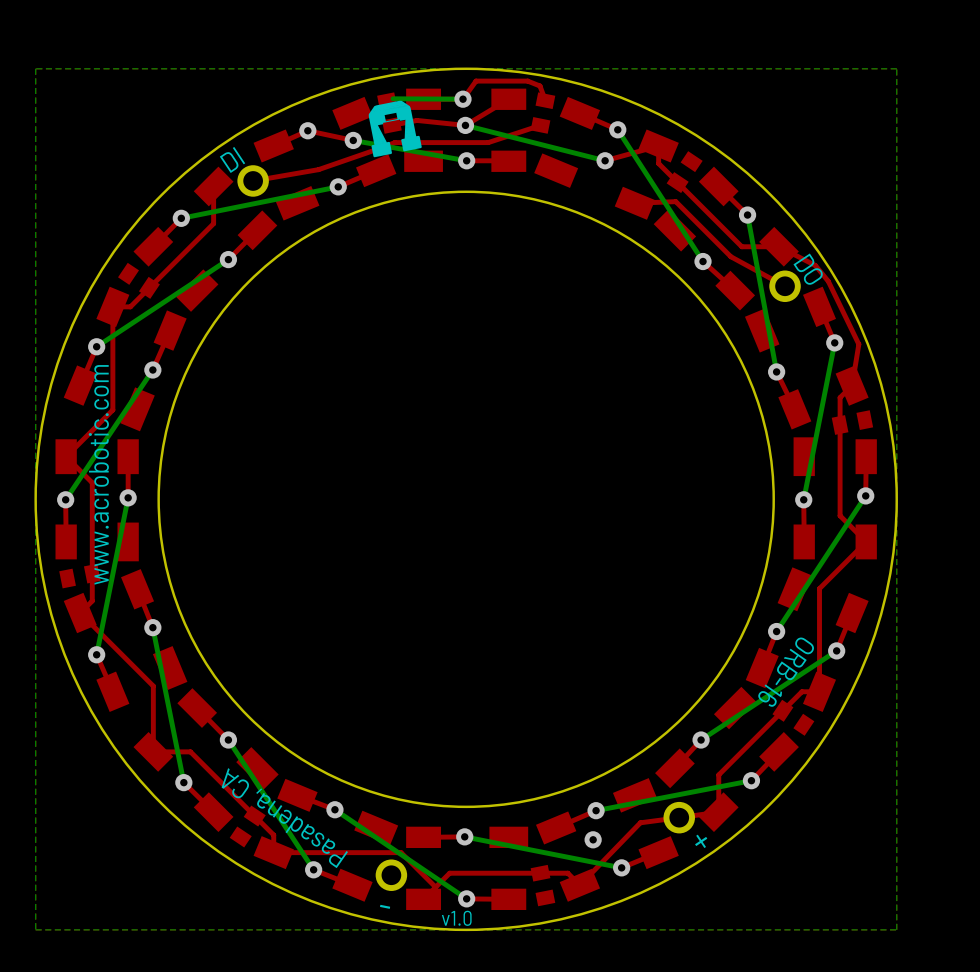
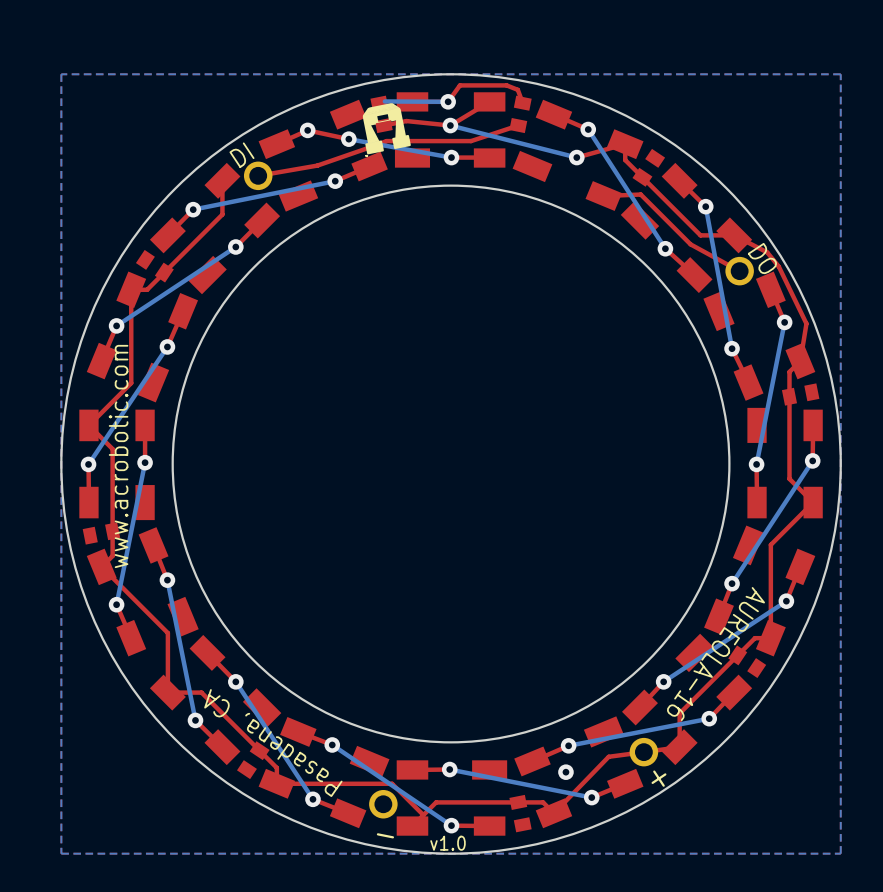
text: ORB-16 (786, 672) -> AUREOLA-16 (715, 654)

